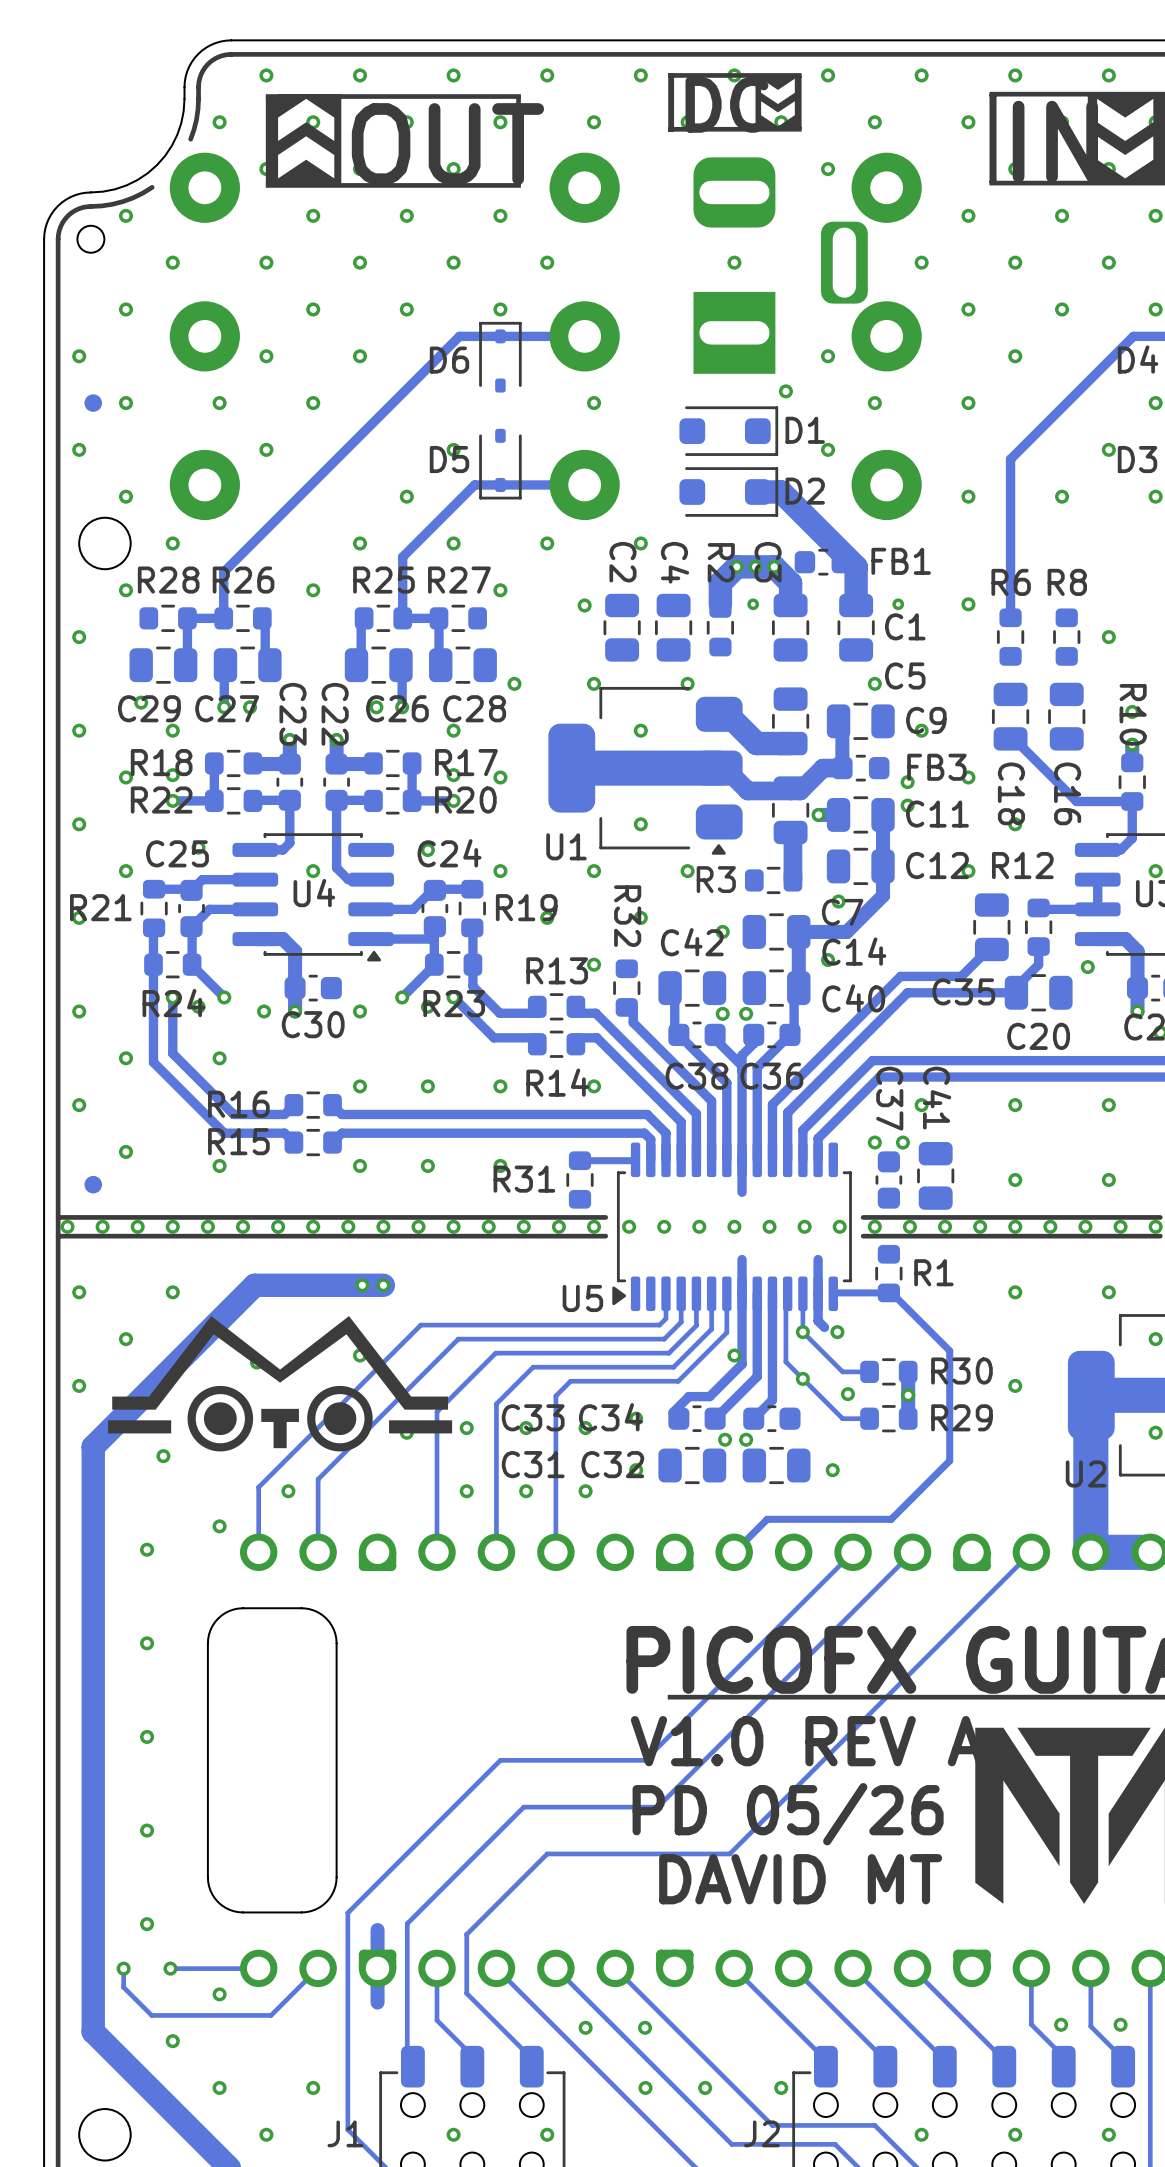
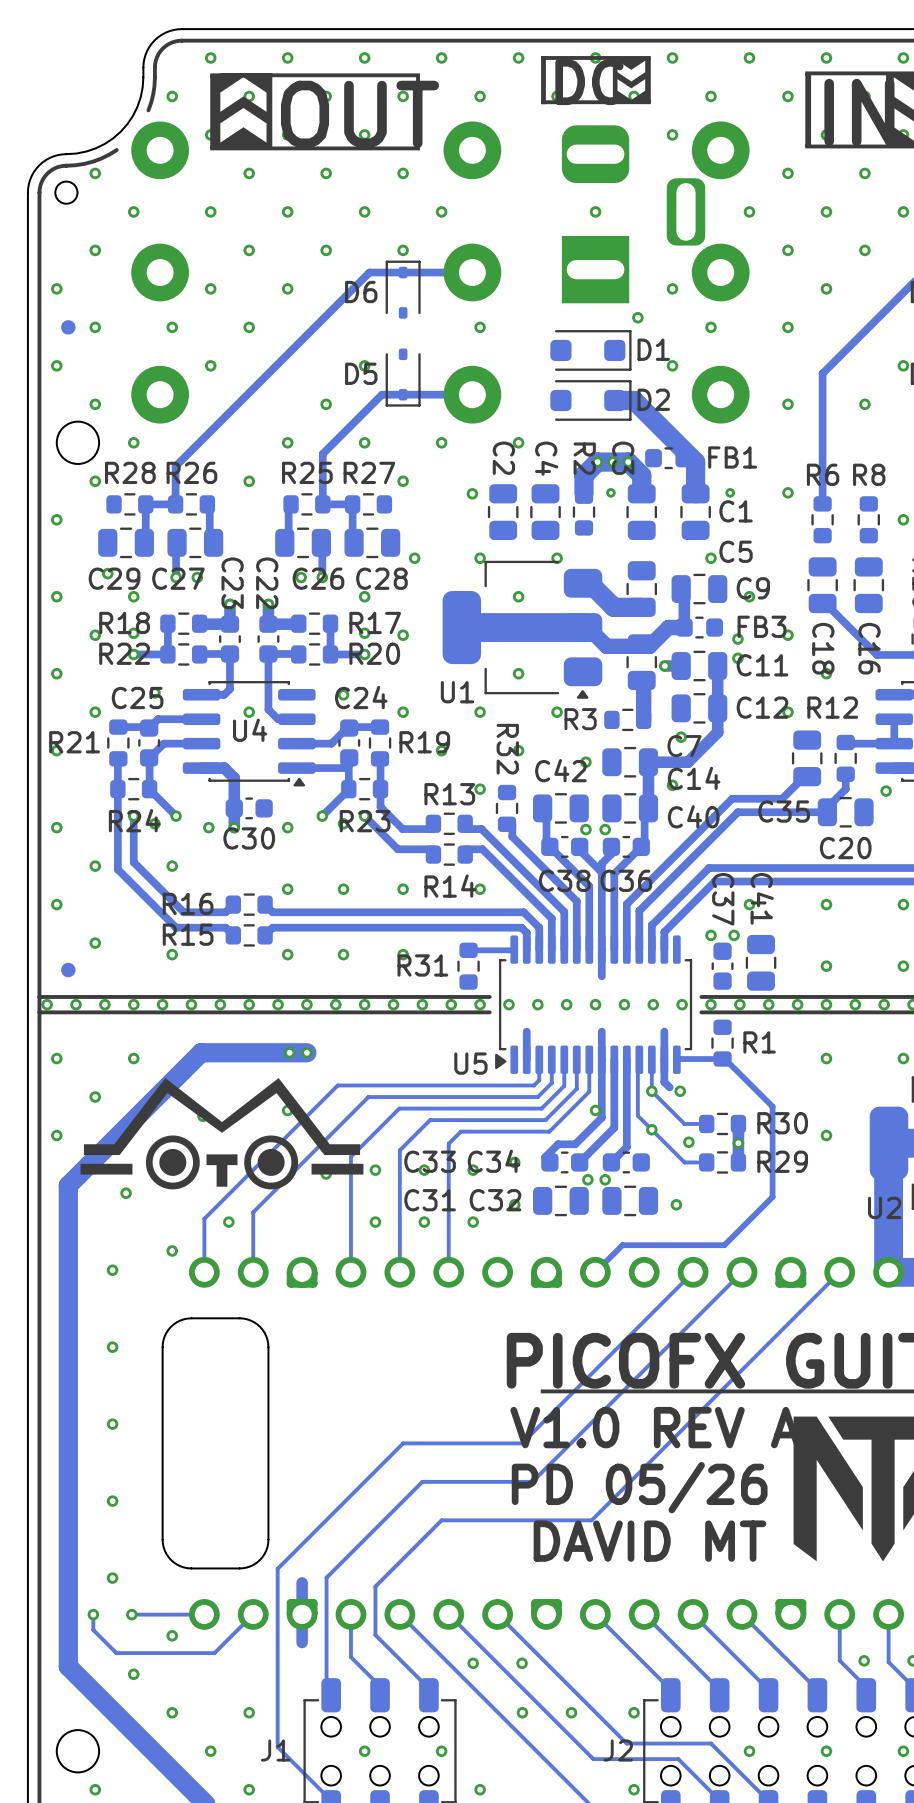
track: none -> (526, 1031) (526, 1059)

